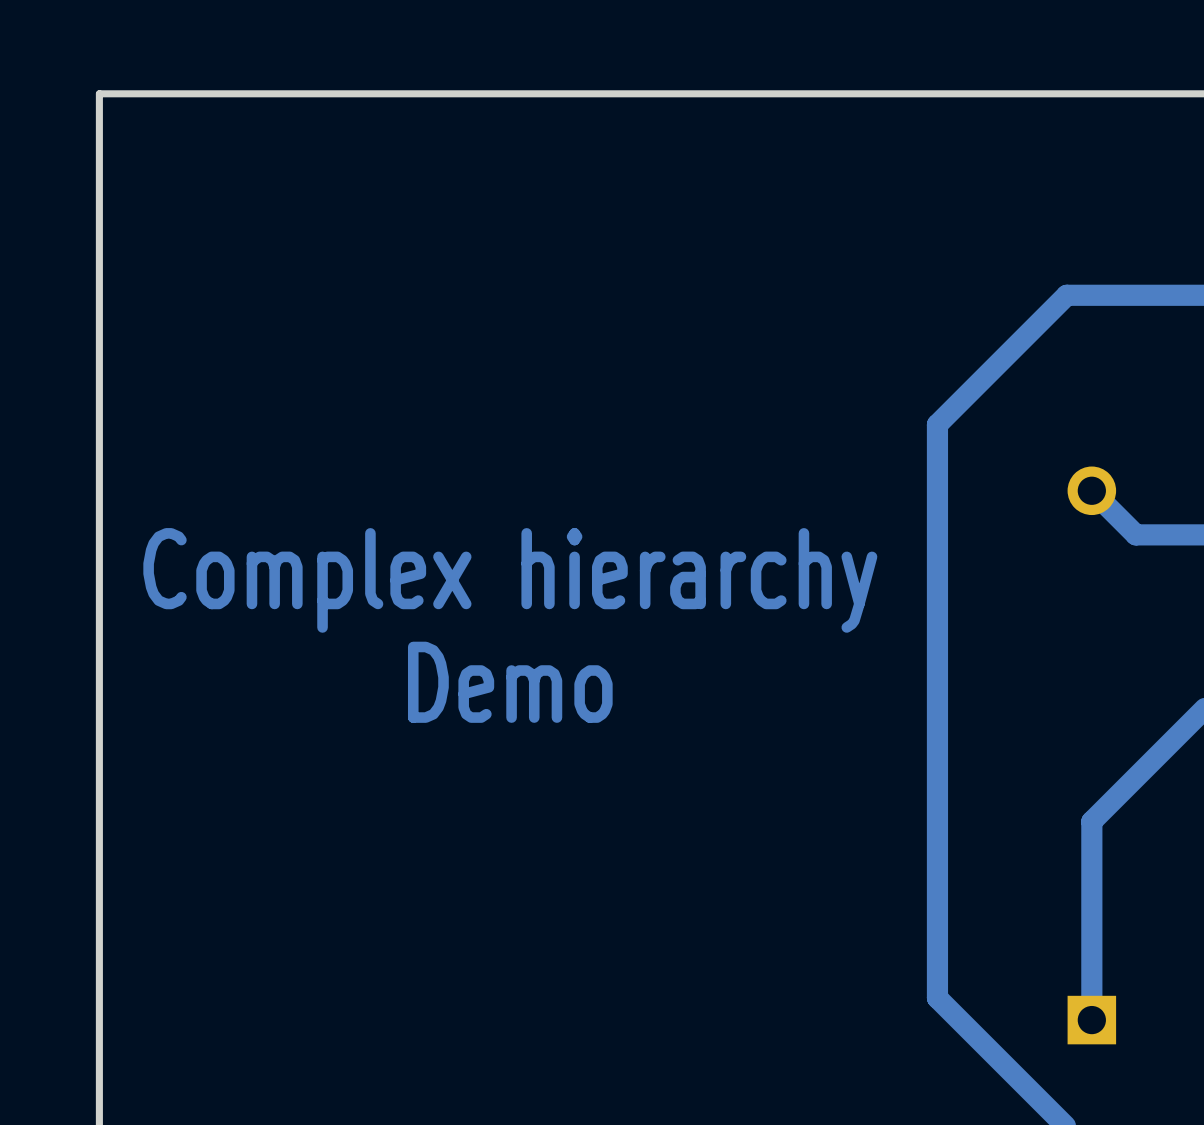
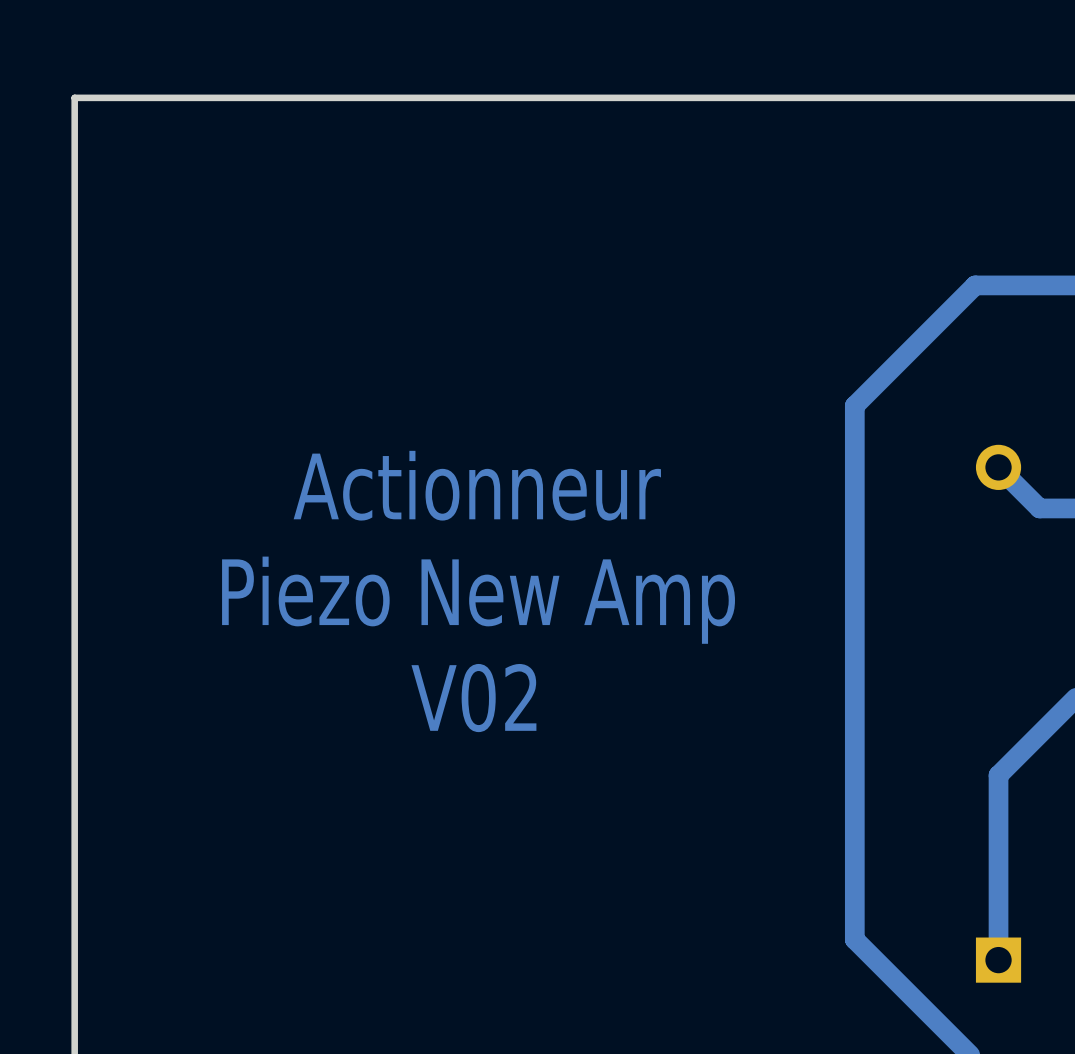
text: none -> Actionneur (477, 485)
text: Complex hierarchy (510, 580) -> none
text: none -> Piezo New Amp (478, 600)
text: Demo (510, 682) -> none
text: none -> V02 (473, 698)

